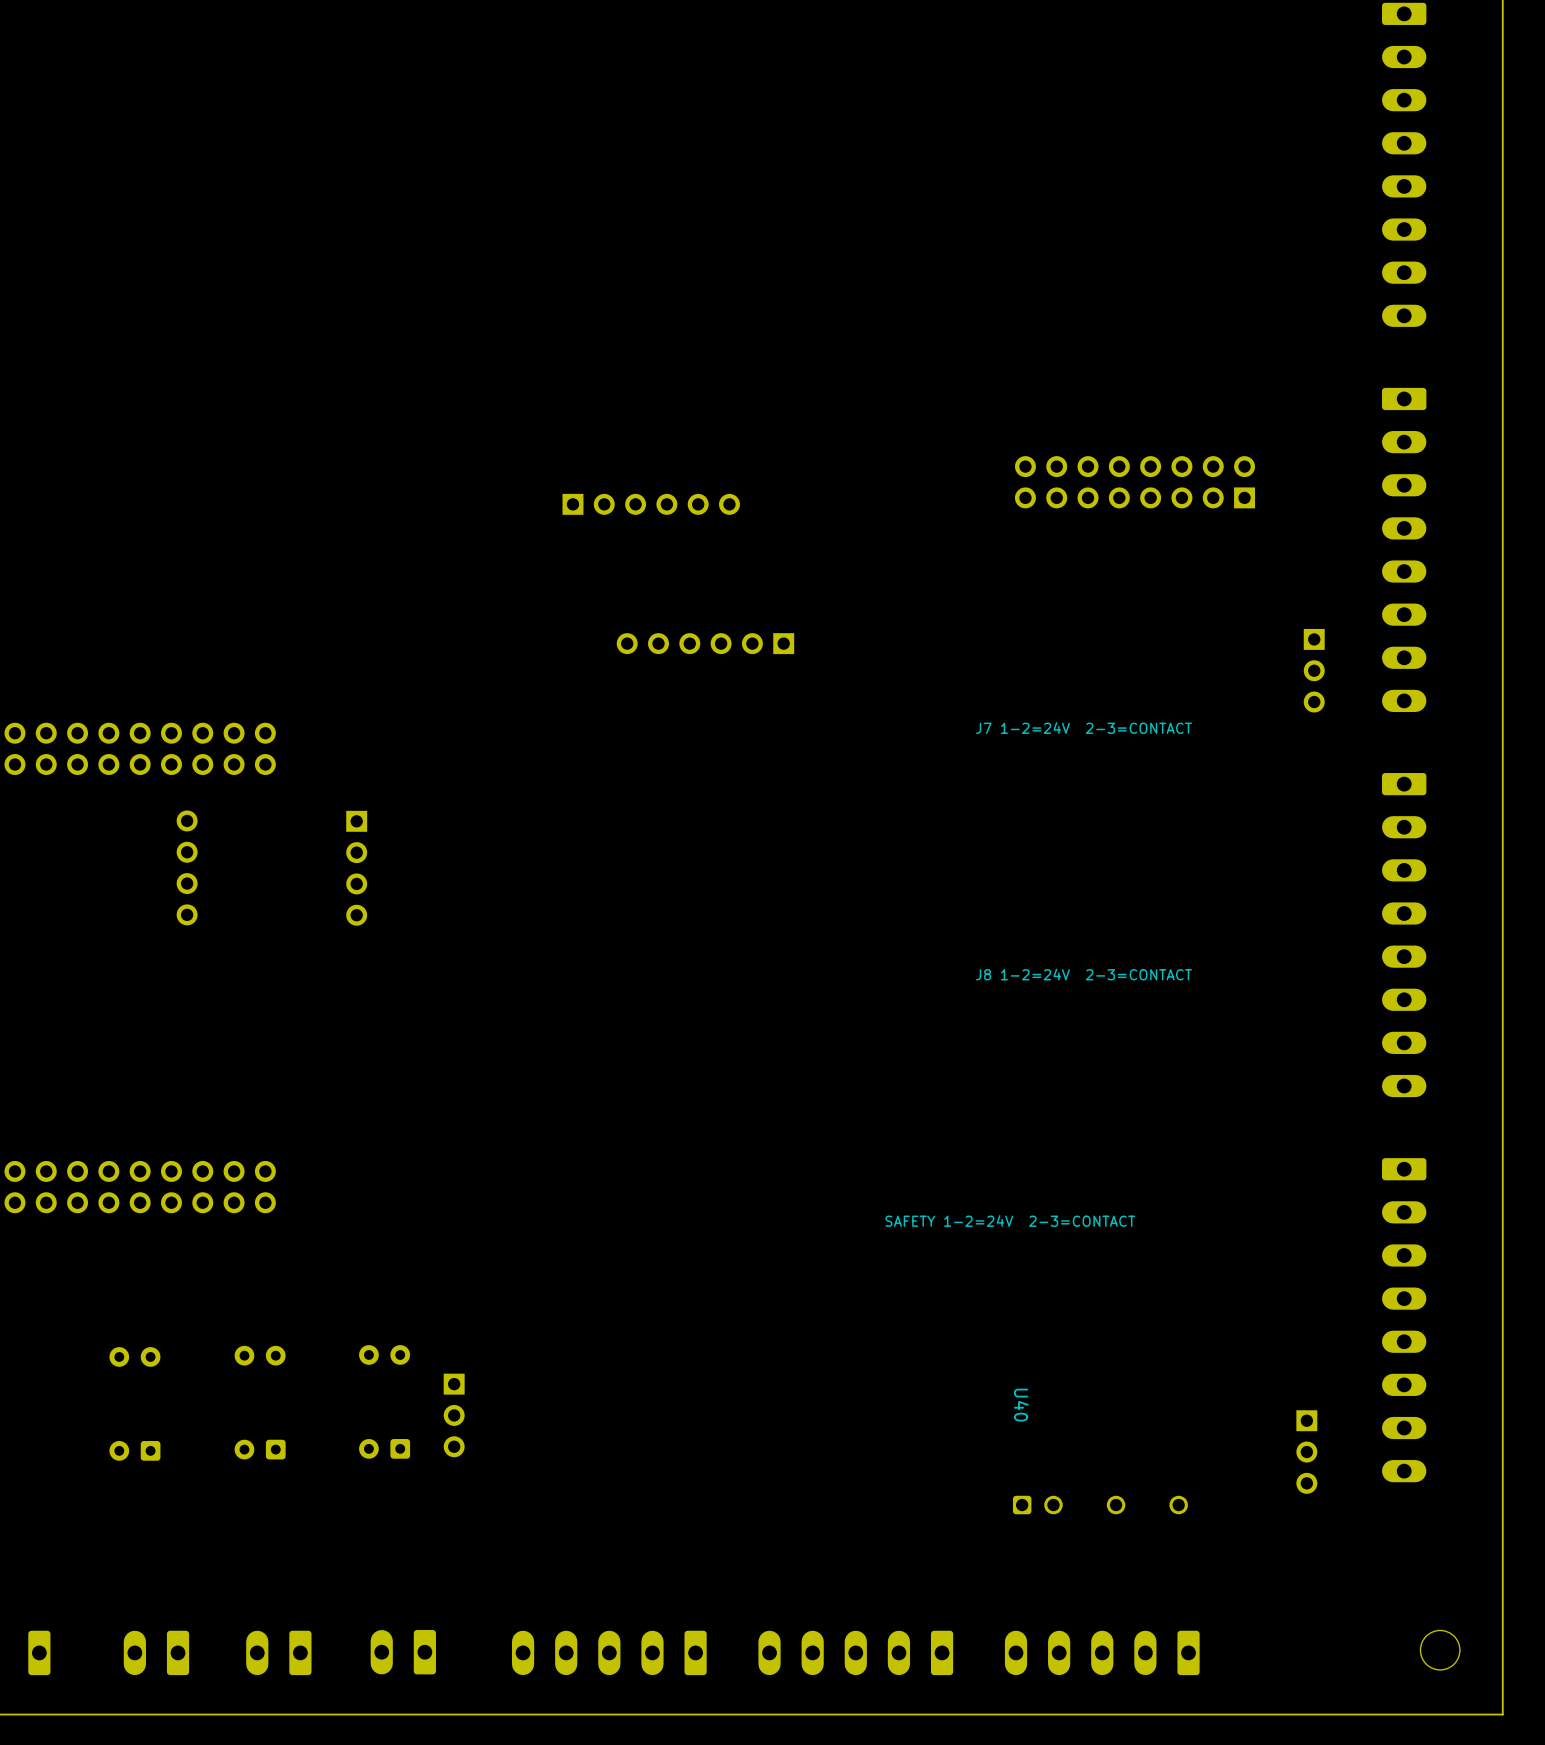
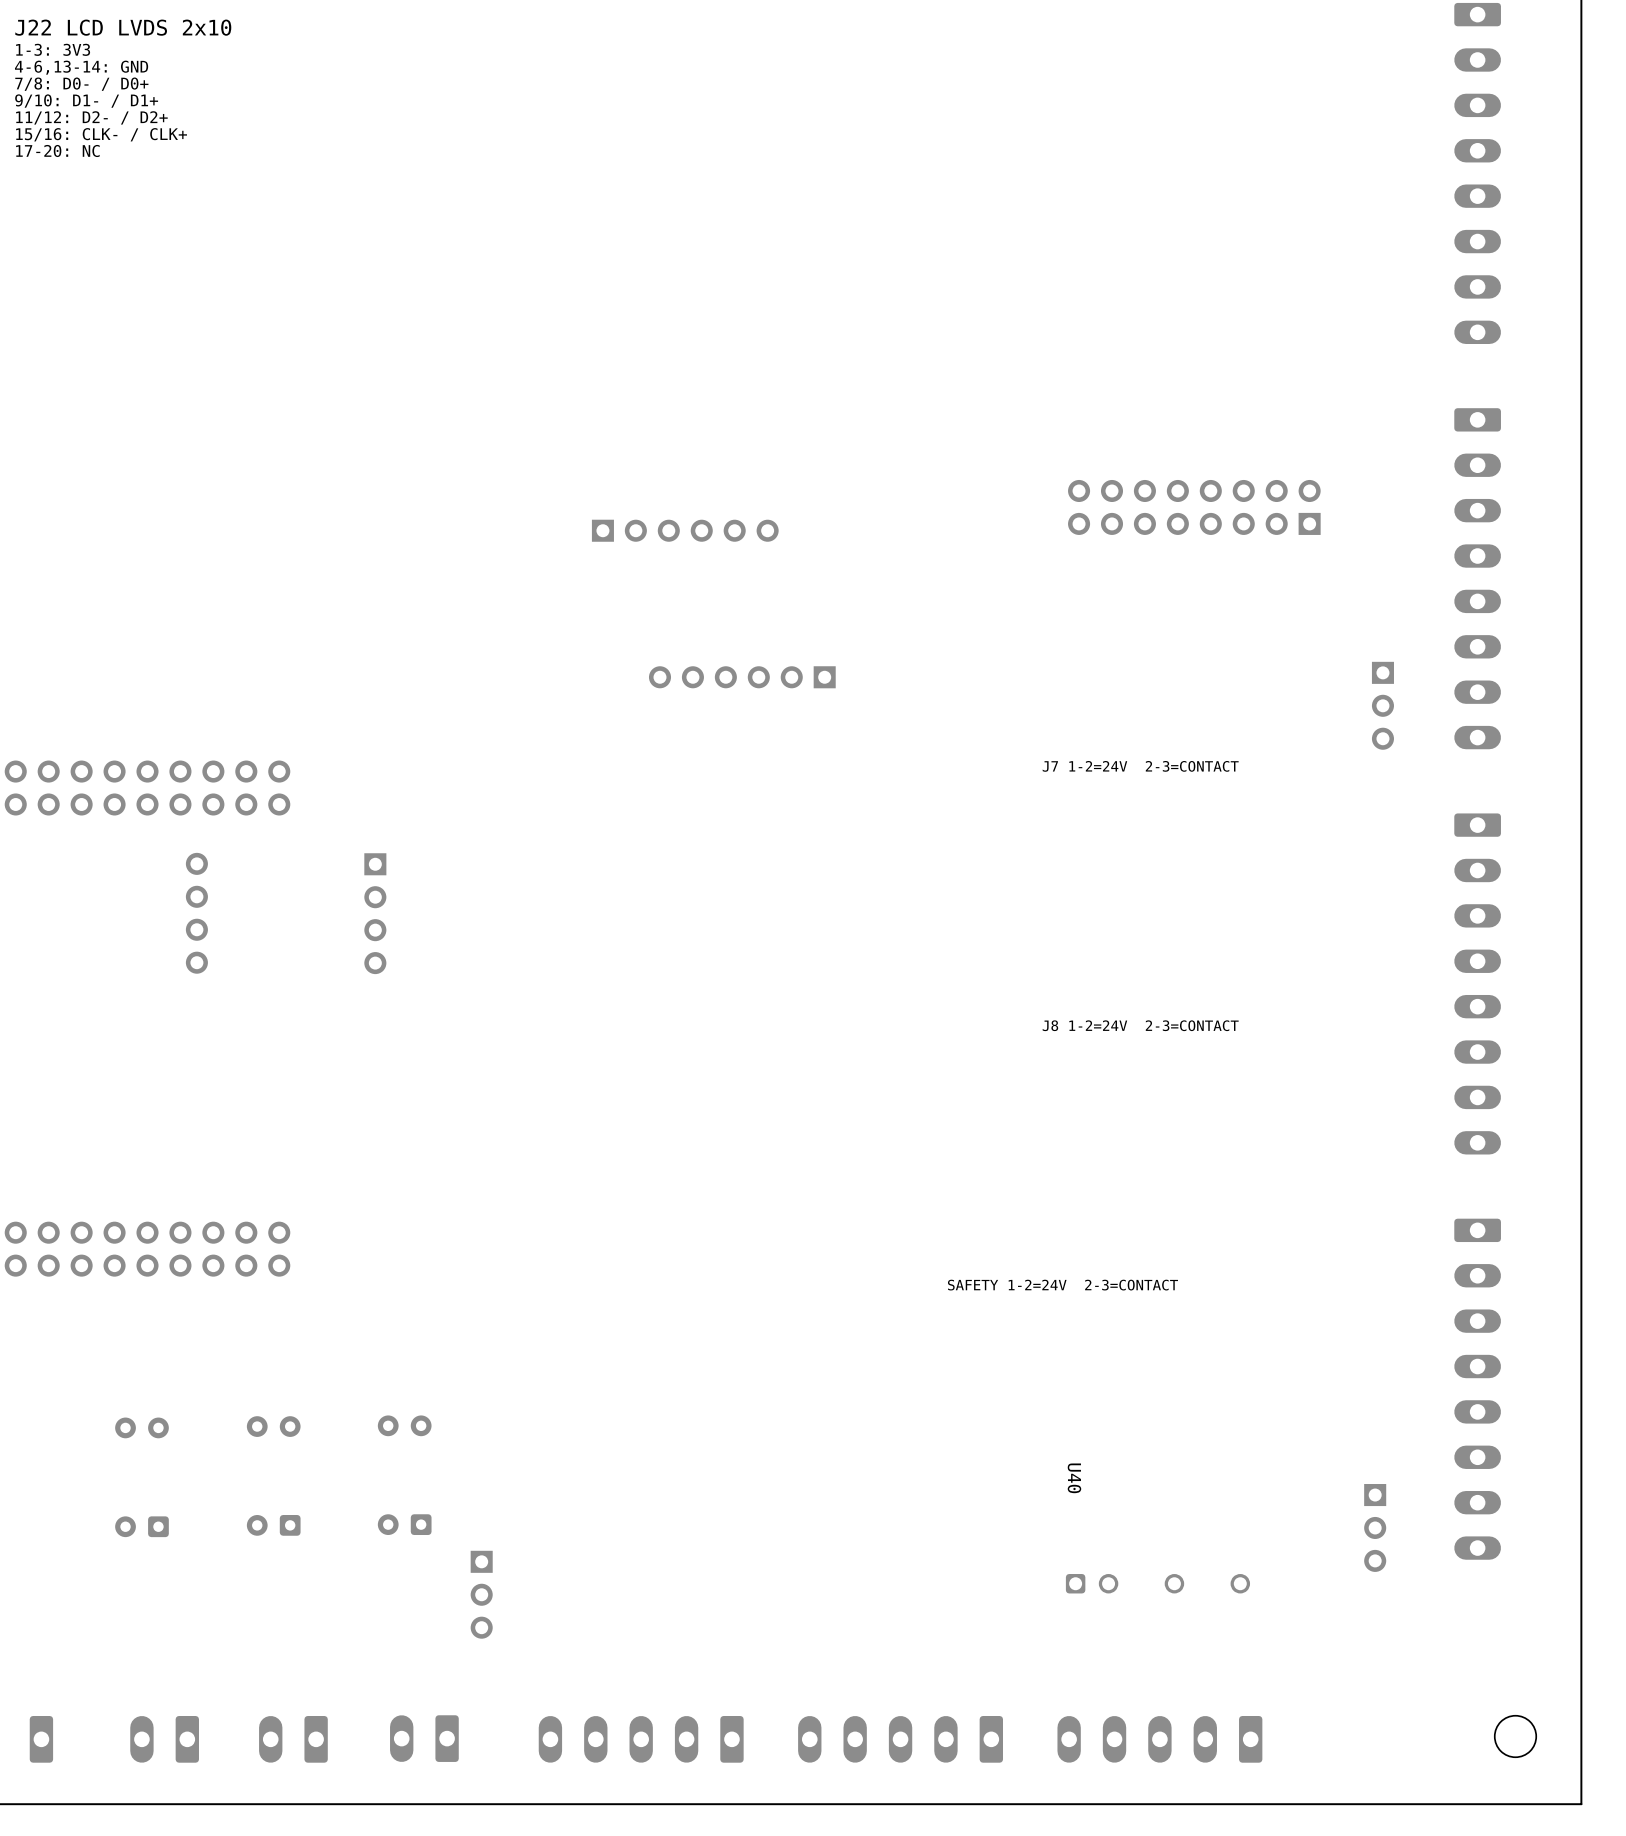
text: none -> J22 LCD LVDS 2x10 (123, 27)
text: none -> 1-3: 3V3 (53, 49)
text: none -> 4-6,13-14: GND (81, 67)
text: none -> 7/8: D0- / D0+ (81, 84)
text: none -> 9/10: D1- / D1+ (86, 101)
text: none -> 11/12: D2- / D2+ (91, 117)
text: none -> 15/16: CLK- / CLK+ (101, 134)
text: none -> 17-20: NC (57, 150)
part position: (454, 1415) -> (481, 1594)

